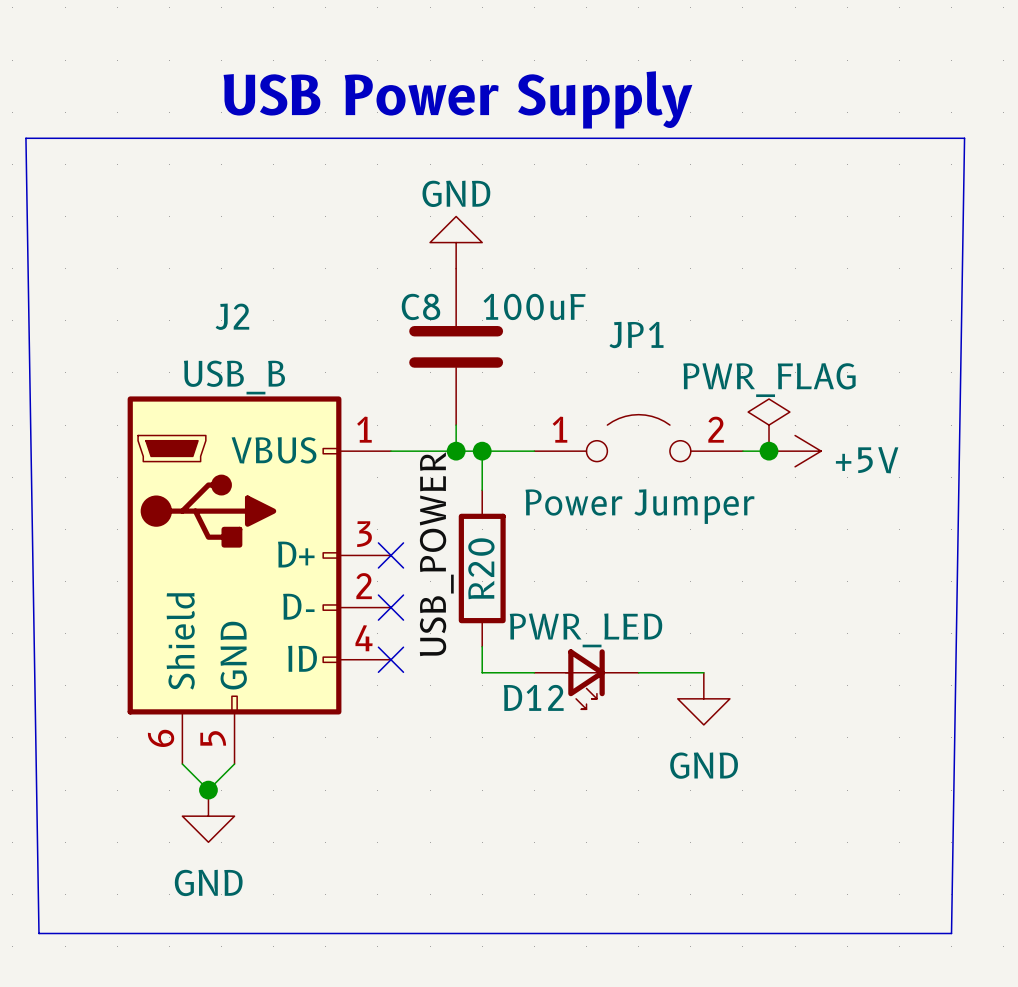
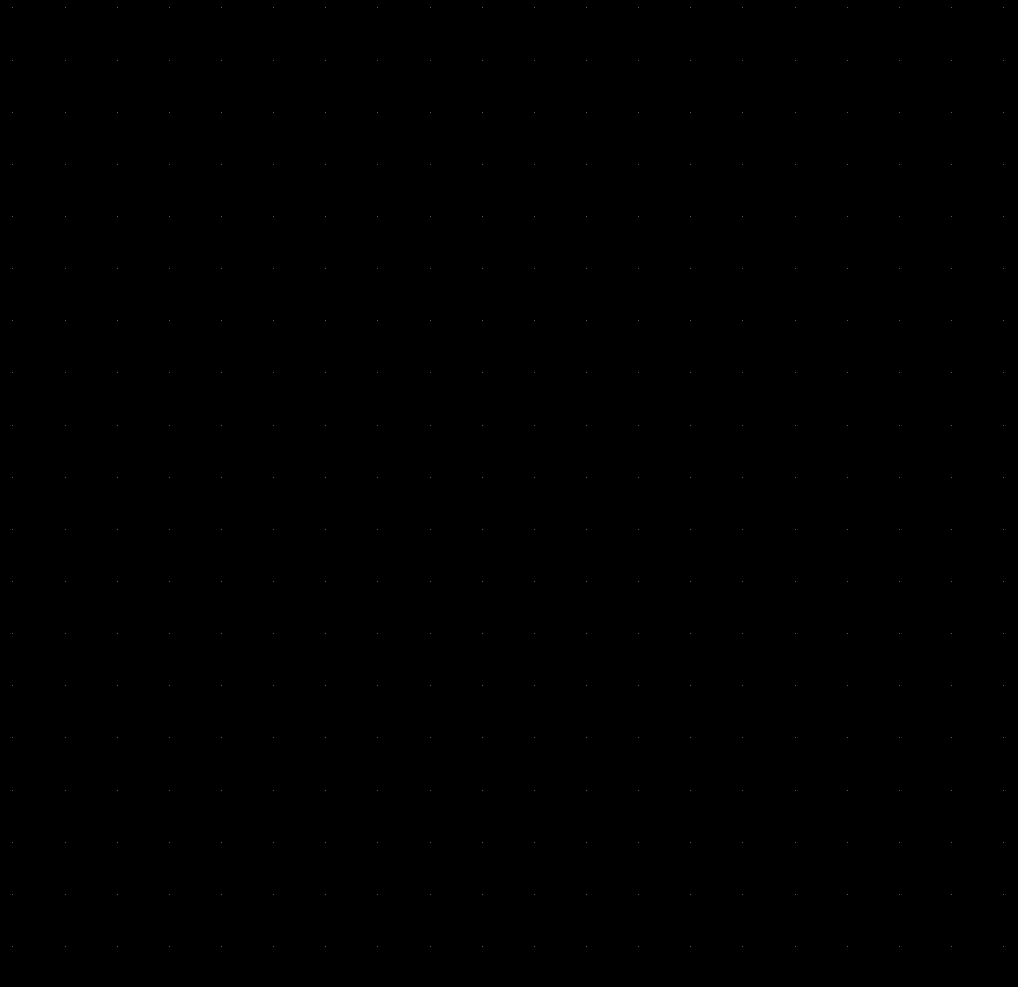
text: USB Power Supply (457, 99) -> none
line: (25, 138) (964, 138) (951, 933) (38, 933) (25, 138) -> none
power symbol: GND (456, 242) -> none
C8: 100uF (456, 346) -> none
wire: (456, 425) (456, 451) -> none
power symbol: PWR_FLAG (769, 425) -> none
JP1: Power Jumper (638, 438) -> none
wire: (390, 451) (534, 451) -> none
junction: (456, 451) -> none
wire: (482, 451) (482, 490) -> none
junction: (482, 451) -> none
wire: (742, 451) (769, 451) -> none
junction: (769, 451) -> none
power symbol: +5V (795, 451) -> none
label: USB_POWER (436, 554) -> none
no-connect mark: (390, 555) -> none
R20: (482, 568) -> none
J2: USB_B (259, 580) -> none
no-connect mark: (390, 607) -> none
wire: (482, 646) (482, 672) (534, 672) -> none
no-connect mark: (390, 659) -> none
wire: (638, 672) (703, 672) -> none
D12: PWR_LED (586, 679) -> none
power symbol: GND (703, 698) -> none
wire: (182, 764) (208, 790) (234, 764) -> none
junction: (208, 790) -> none
power symbol: GND (208, 816) -> none

